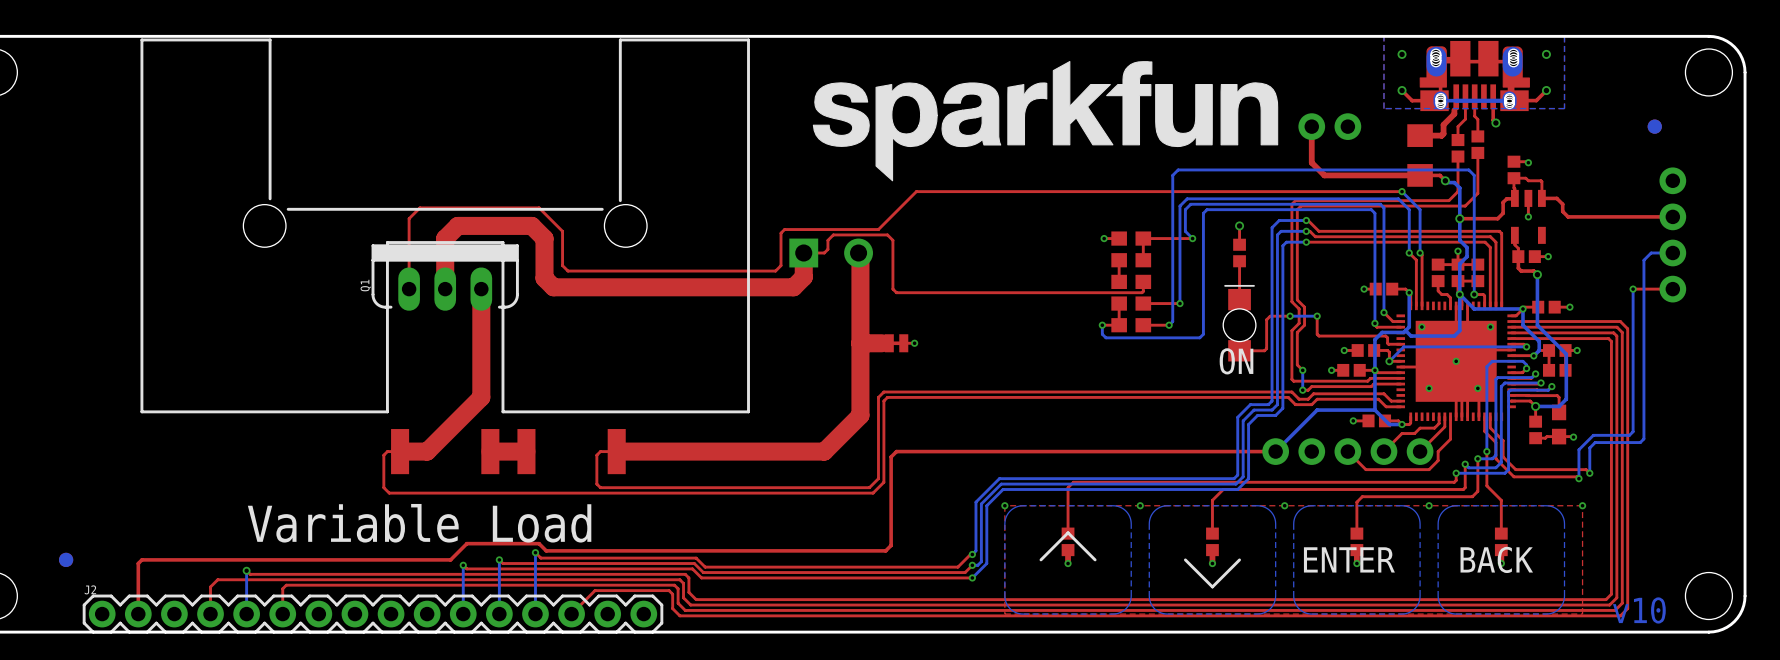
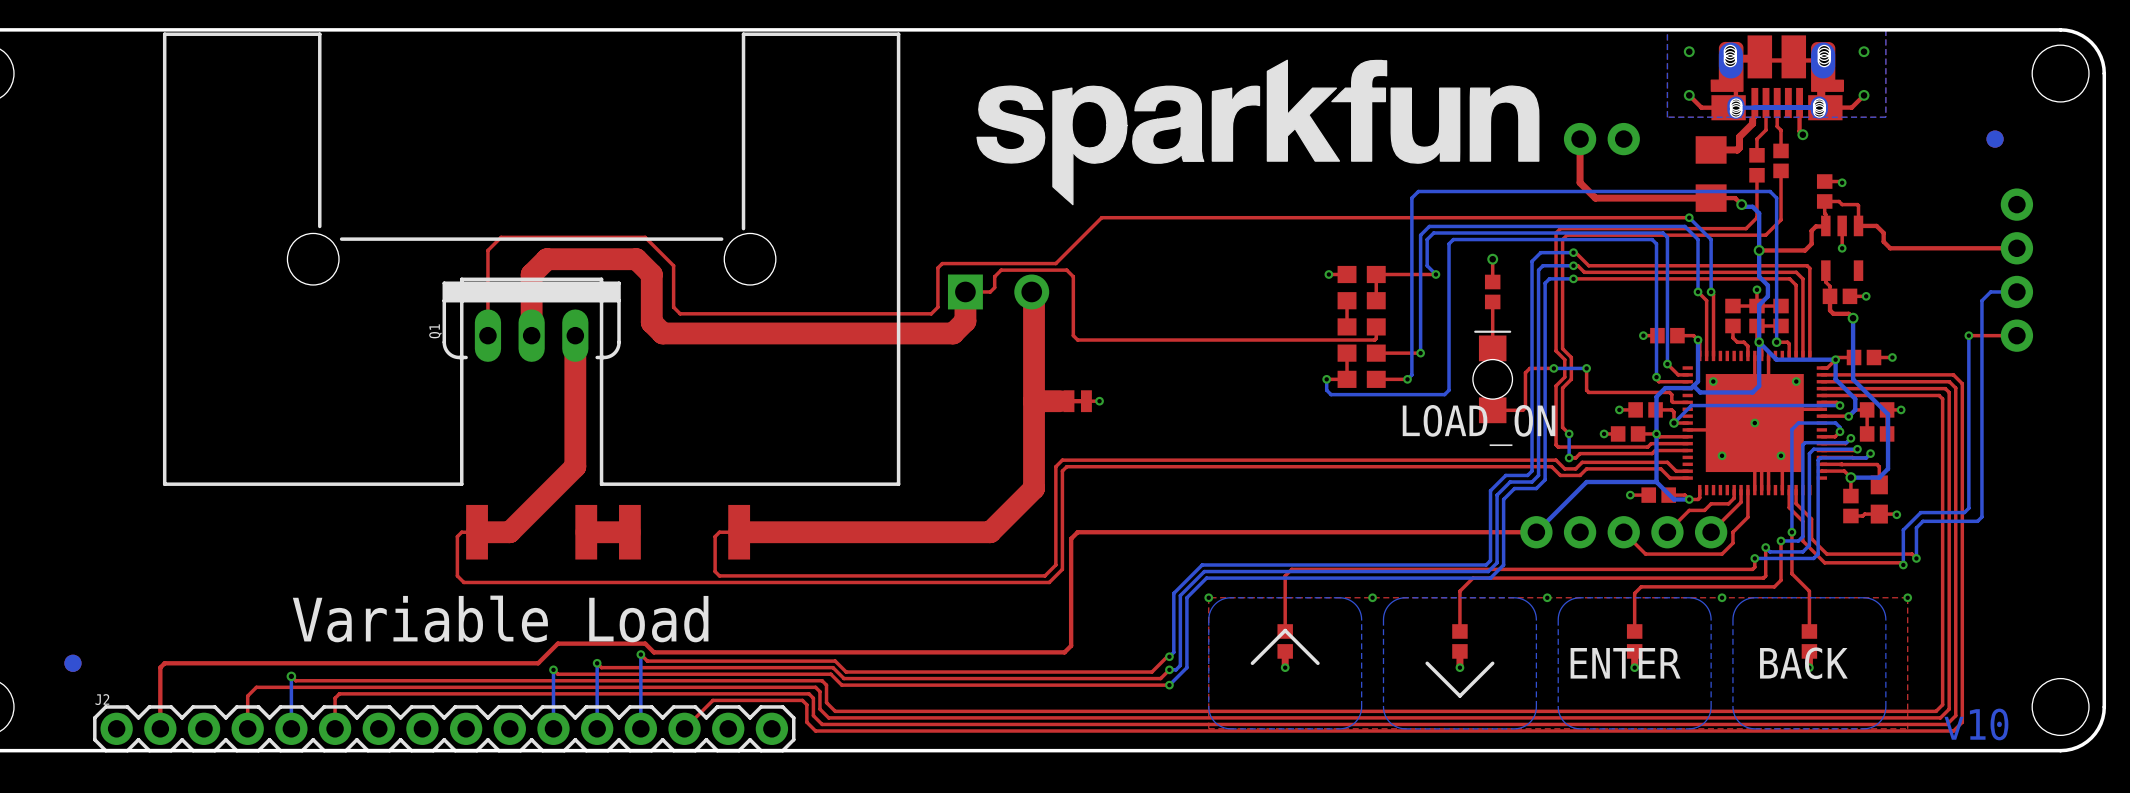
text: ON (1236, 361) -> none
text: none -> LOAD_ON (1479, 425)

